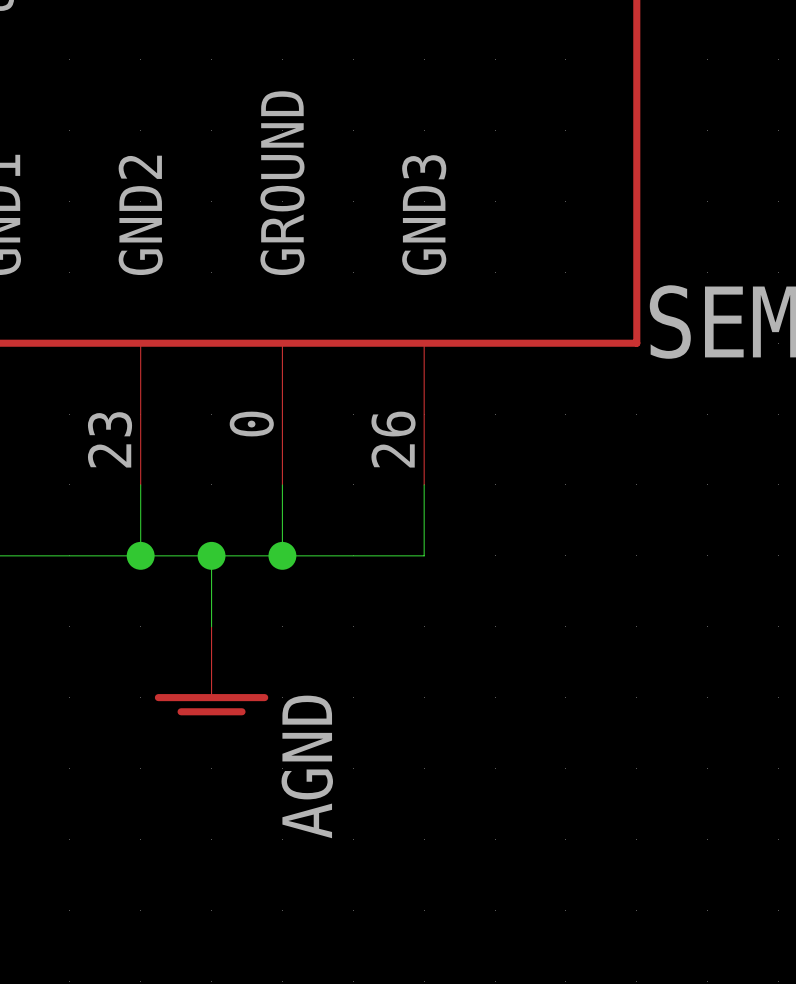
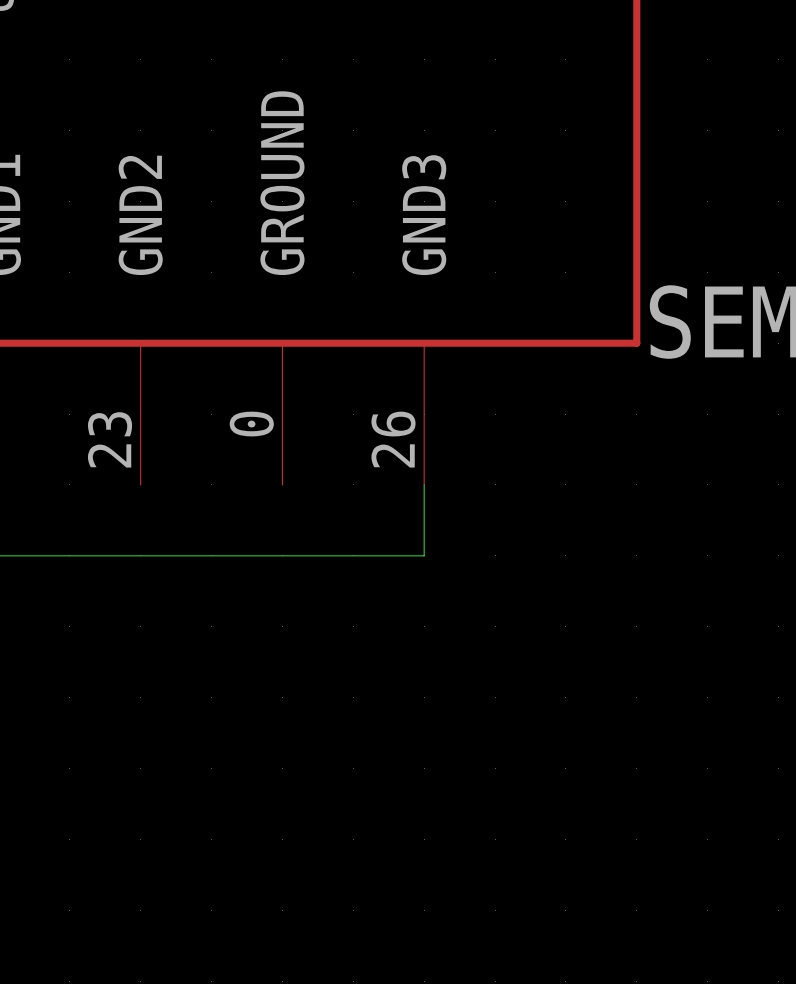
wire: (140, 484) (140, 555) -> none
wire: (282, 484) (282, 555) -> none
junction: (140, 555) -> none
wire: (211, 555) (211, 626) -> none
junction: (211, 555) -> none
junction: (282, 555) -> none
power symbol: AGND (211, 671) -> none

